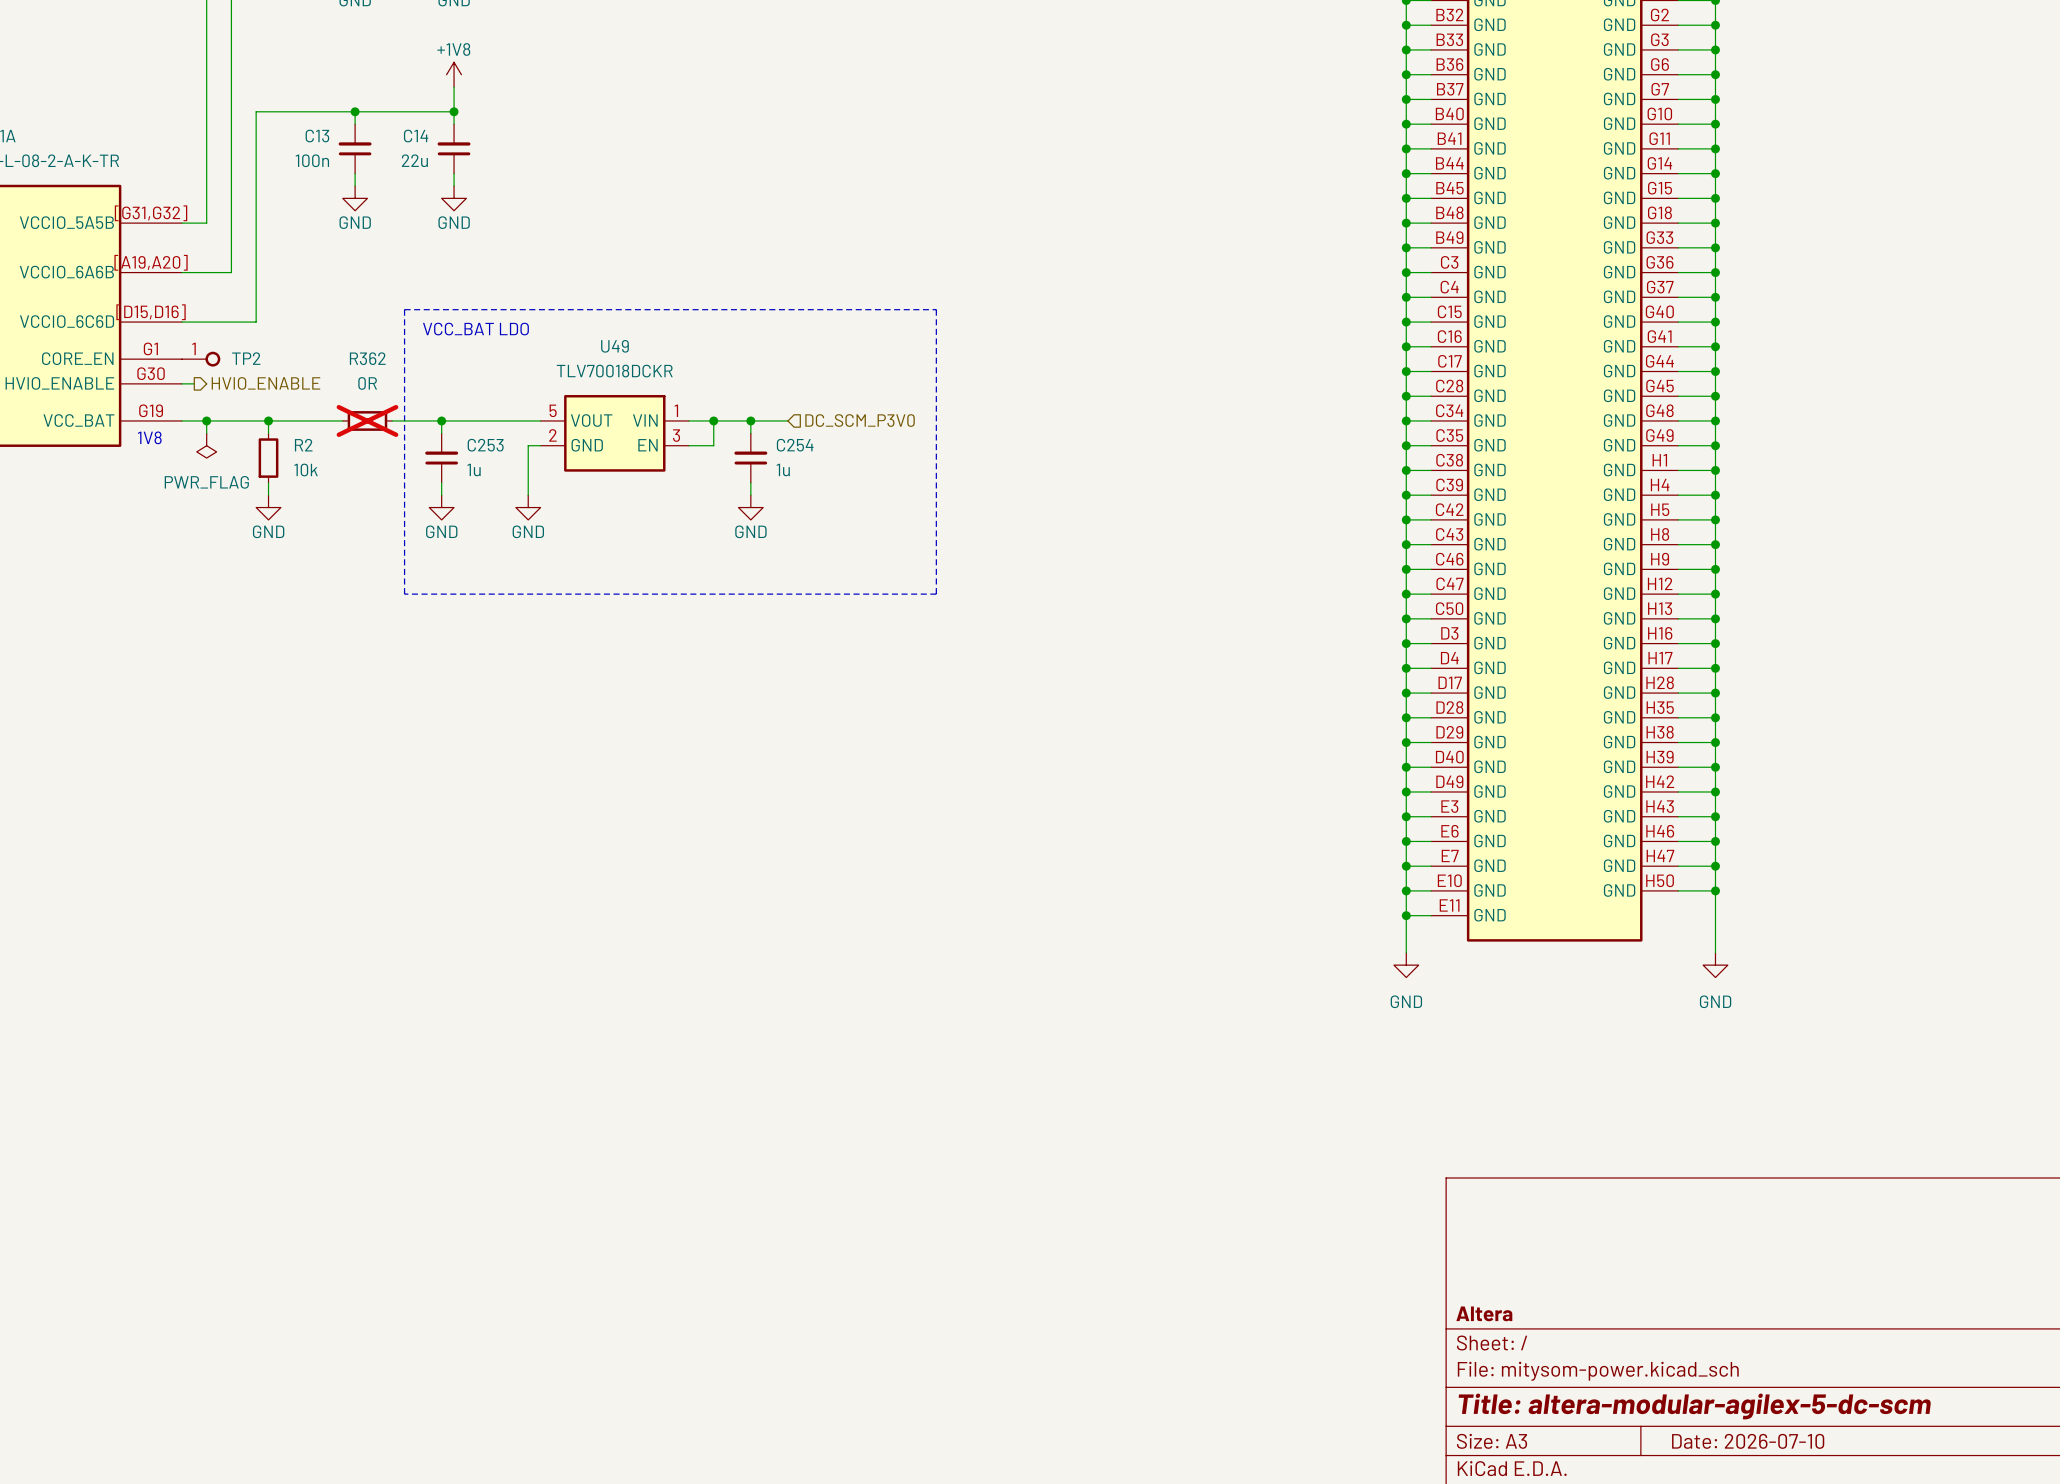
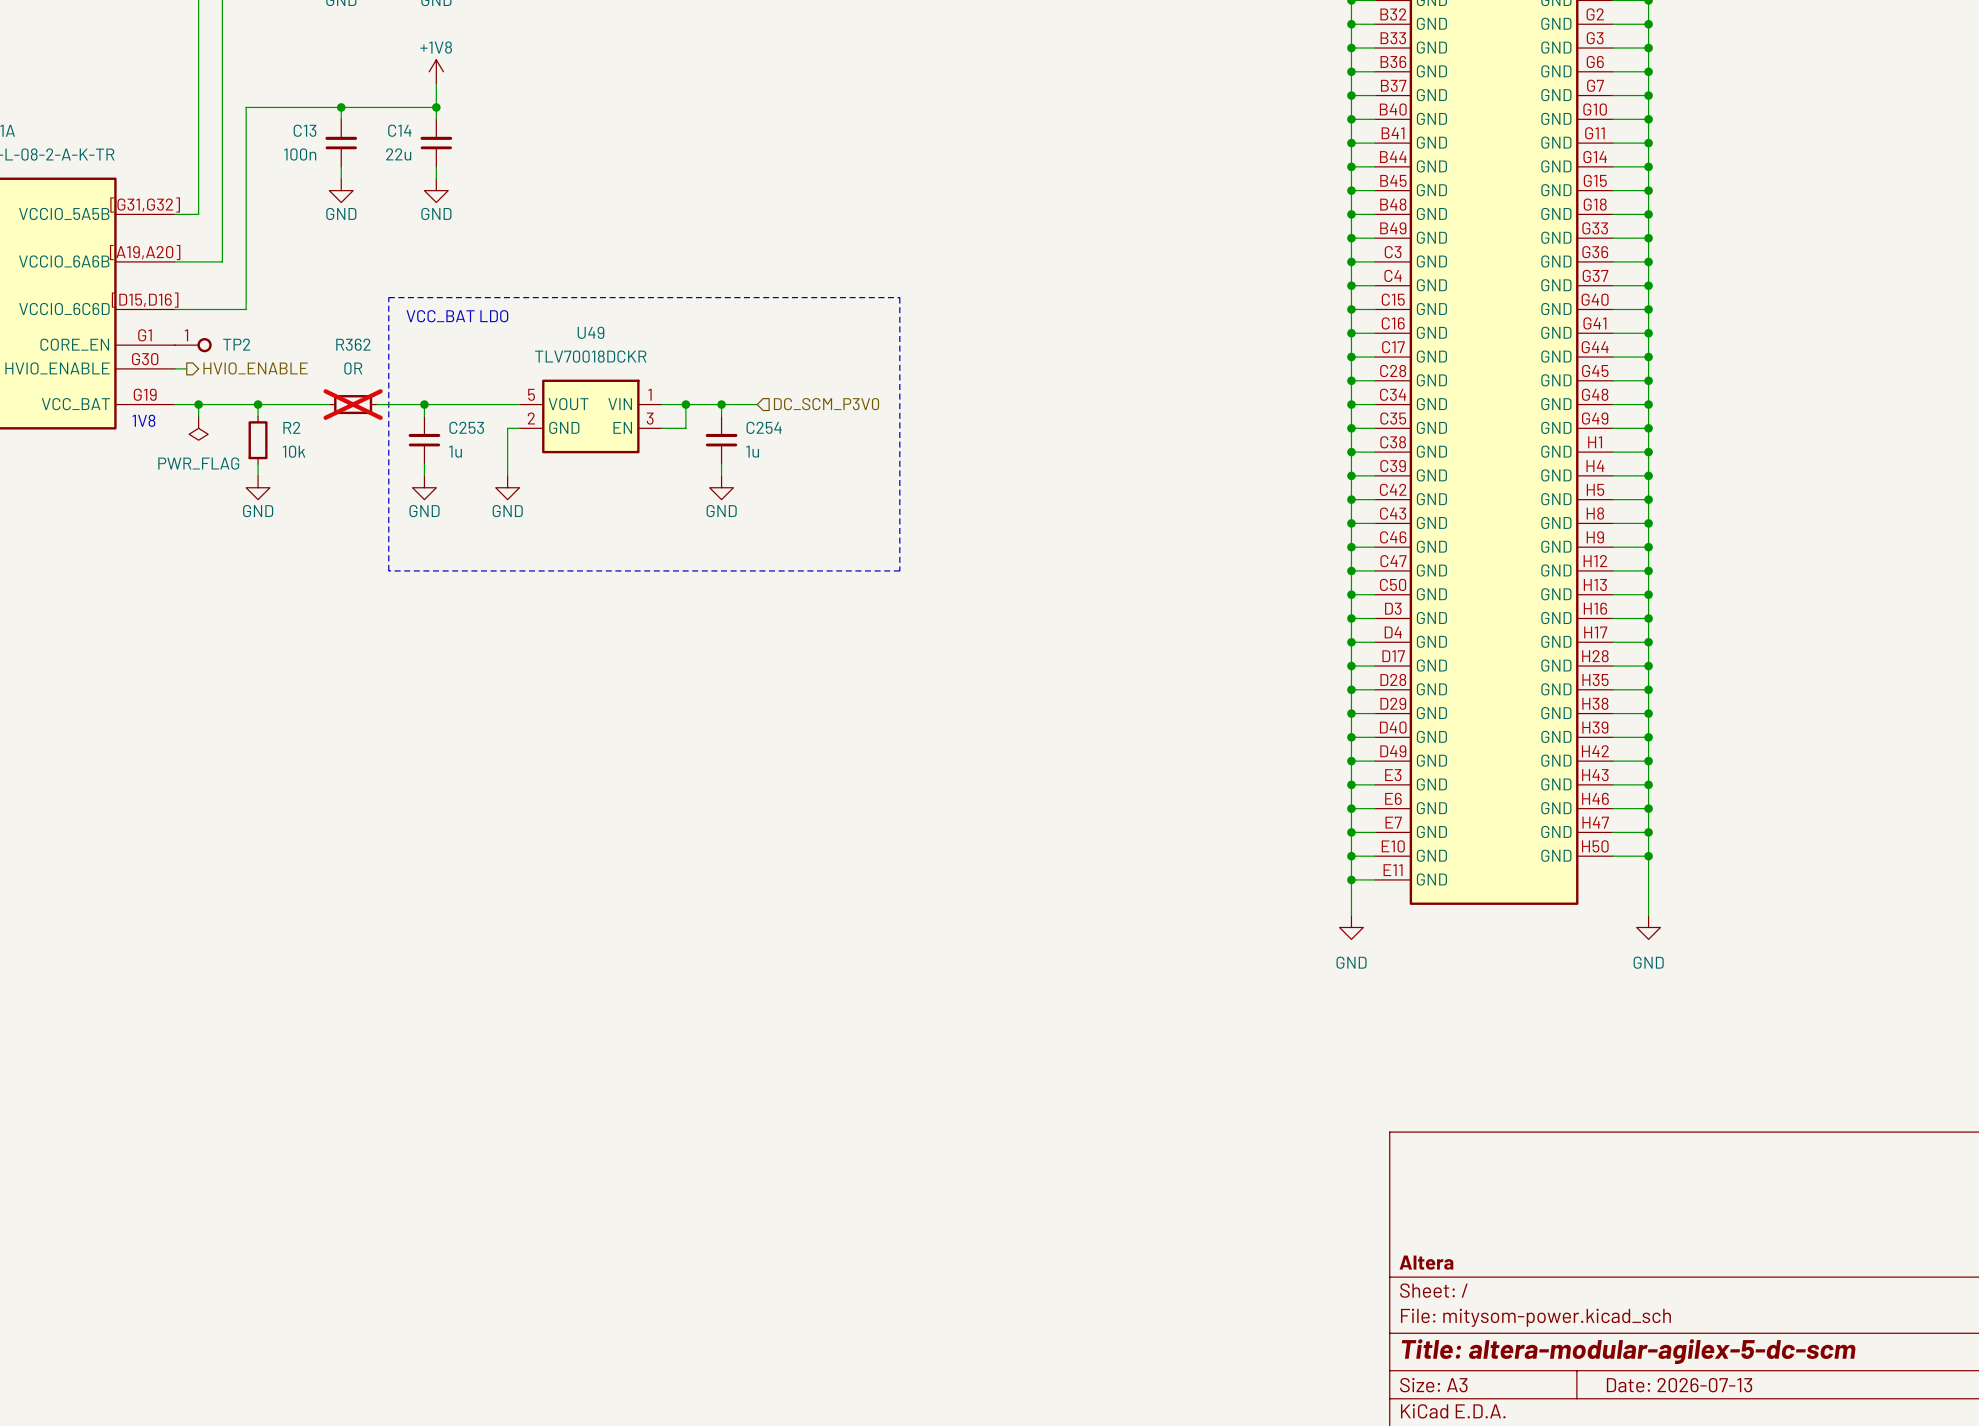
title block: Date: 2026-07-10 (1748, 1441) -> Date: 2026-07-13 (1679, 1385)

